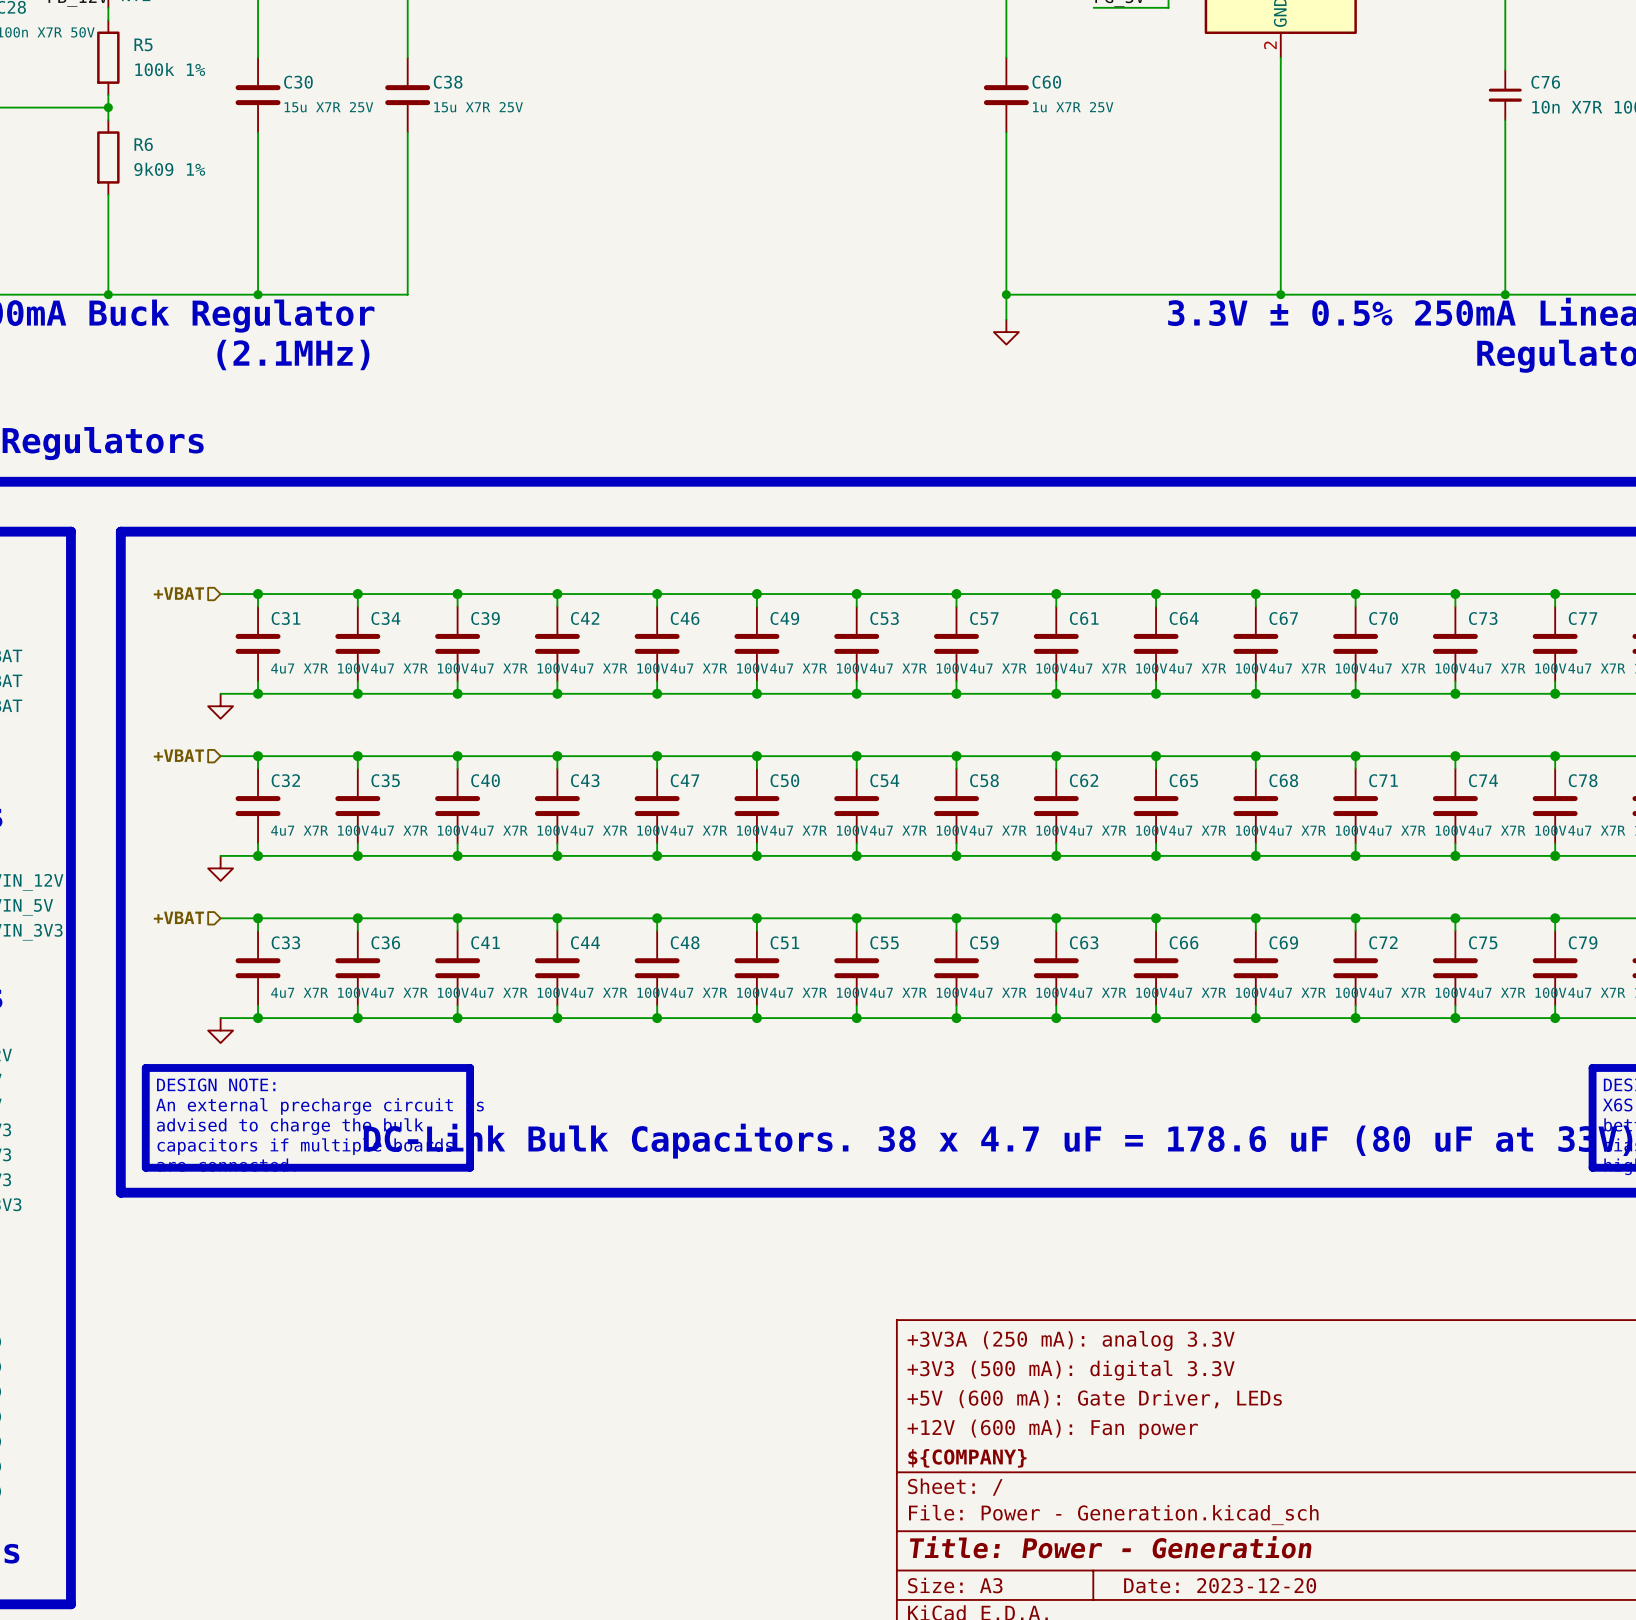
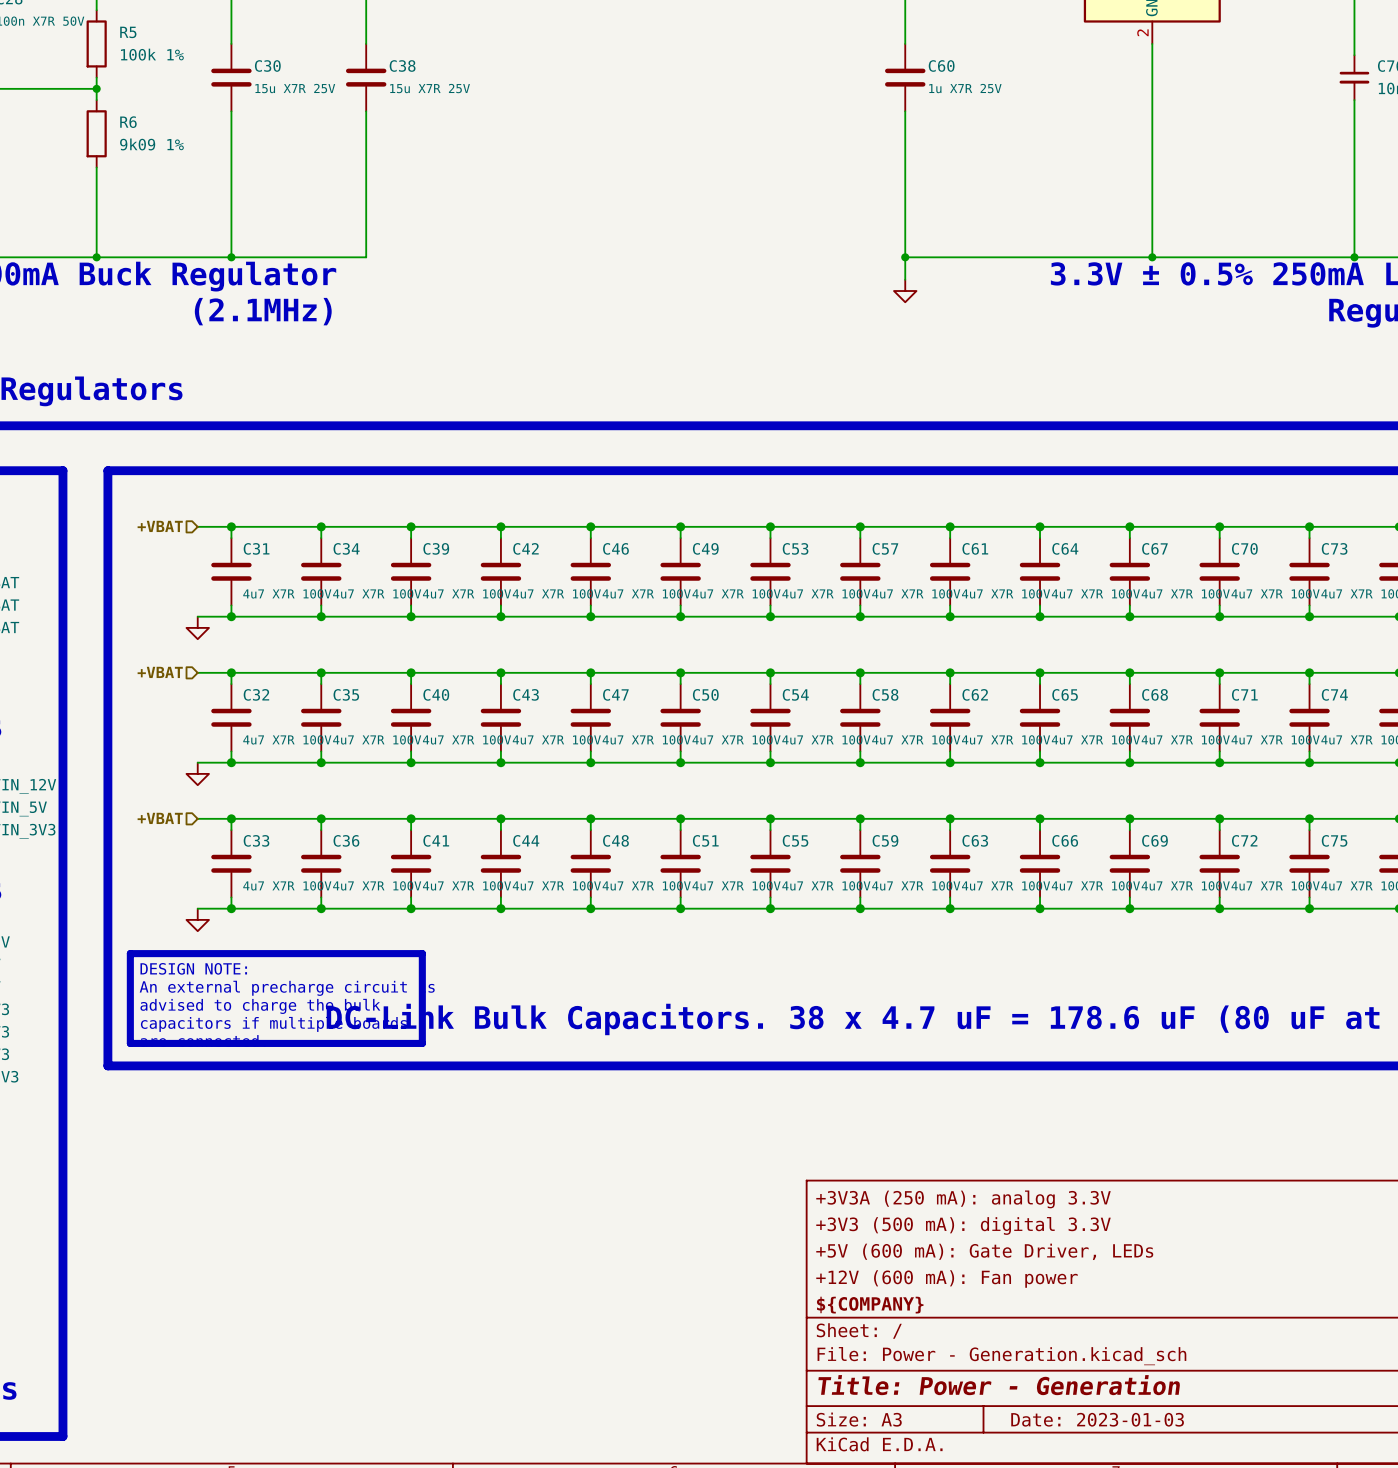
title block: Date: 2023-12-20 (1220, 1585) -> Date: 2023-01-03 (1097, 1419)

